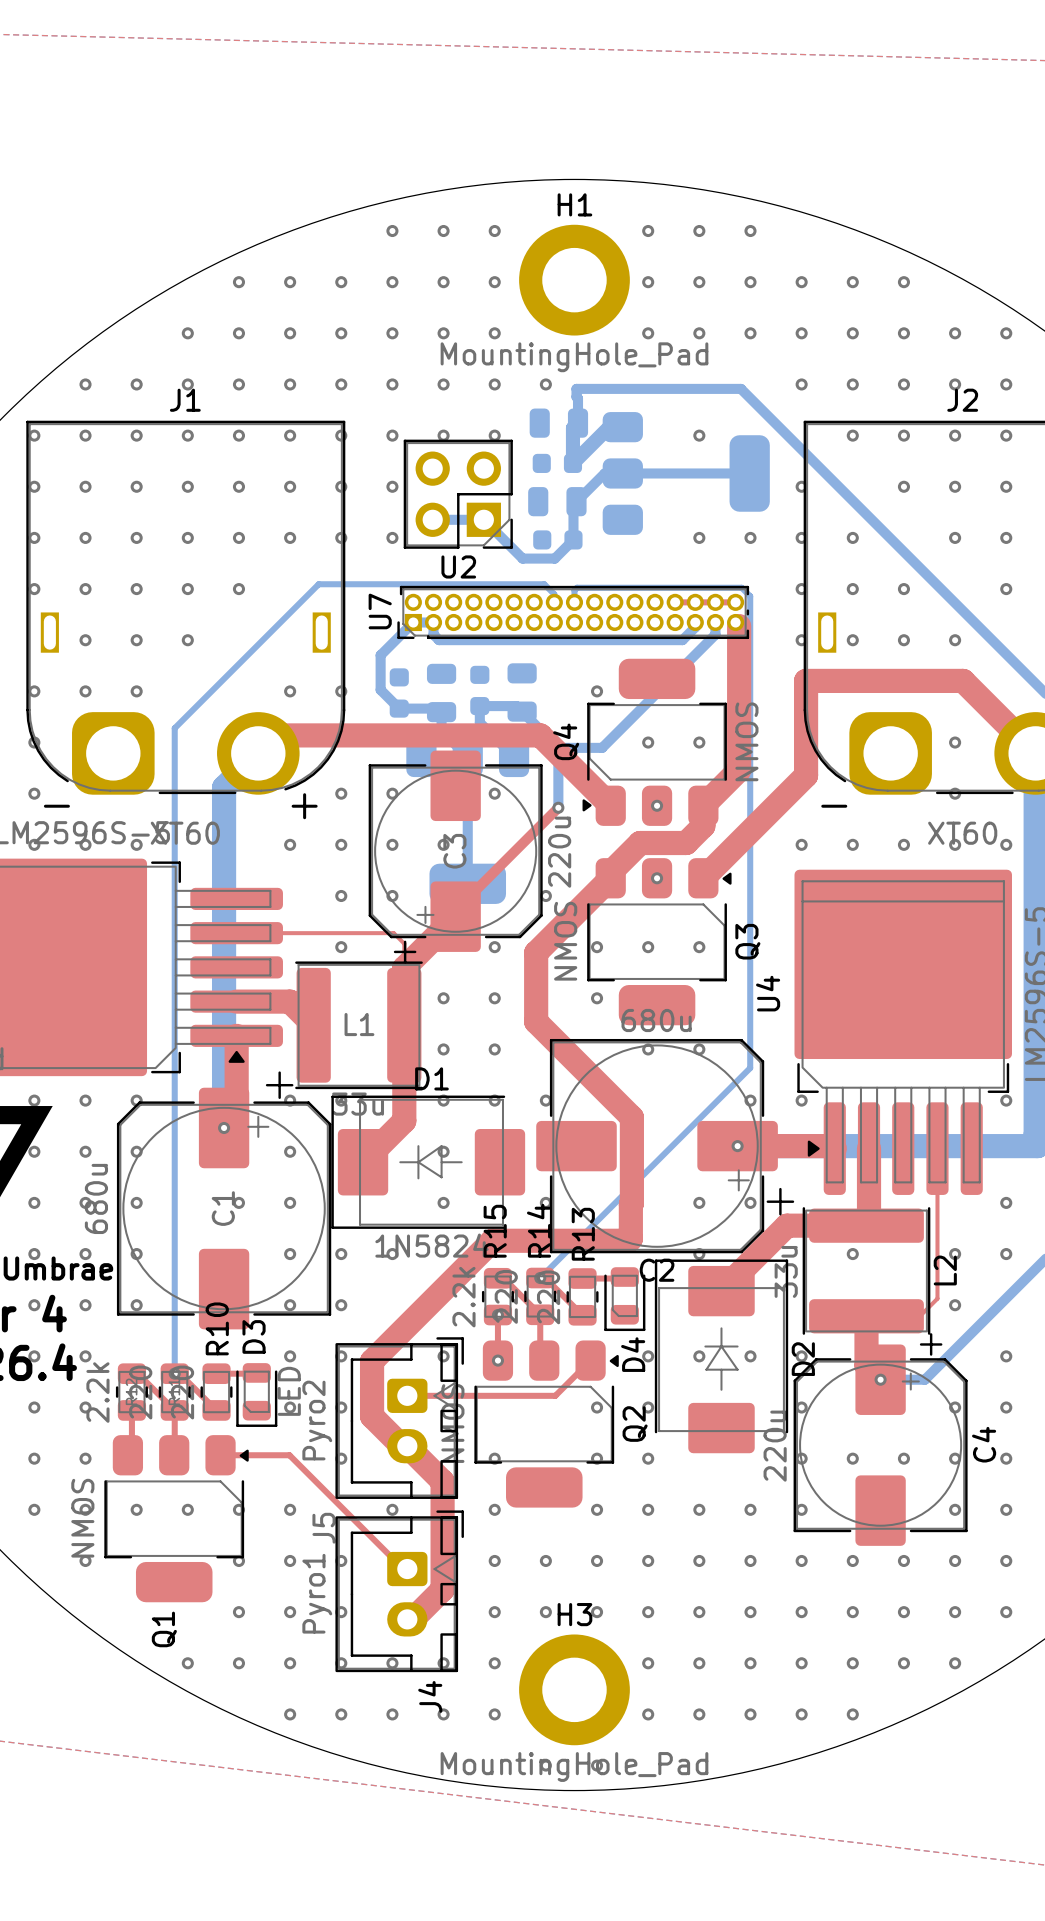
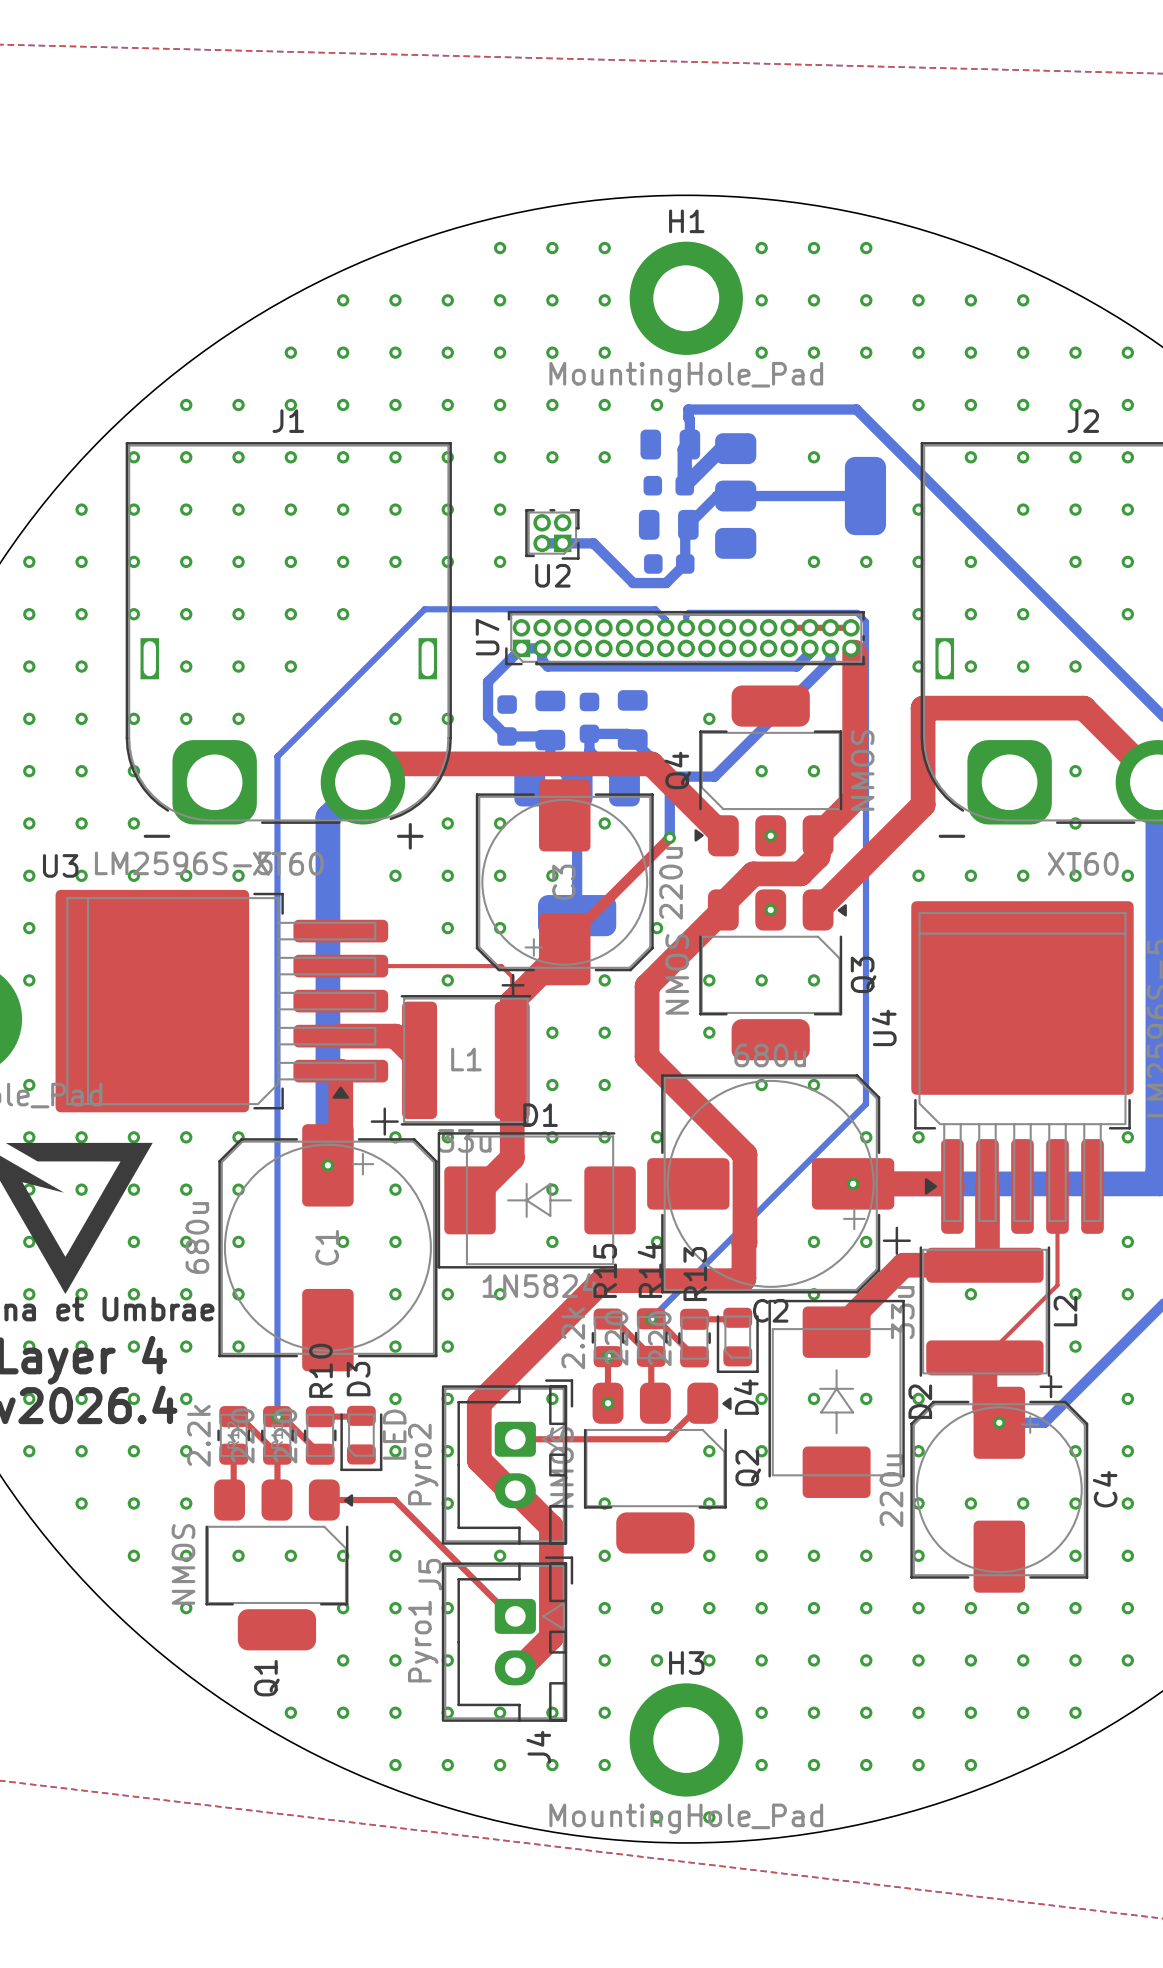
U2 footprint: [403, 439, 513, 549] -> [525, 508, 580, 560]
top track: (937, 1245) (937, 1298) (919, 1316) (866, 1316) -> (1057, 1285) (984, 1357)

